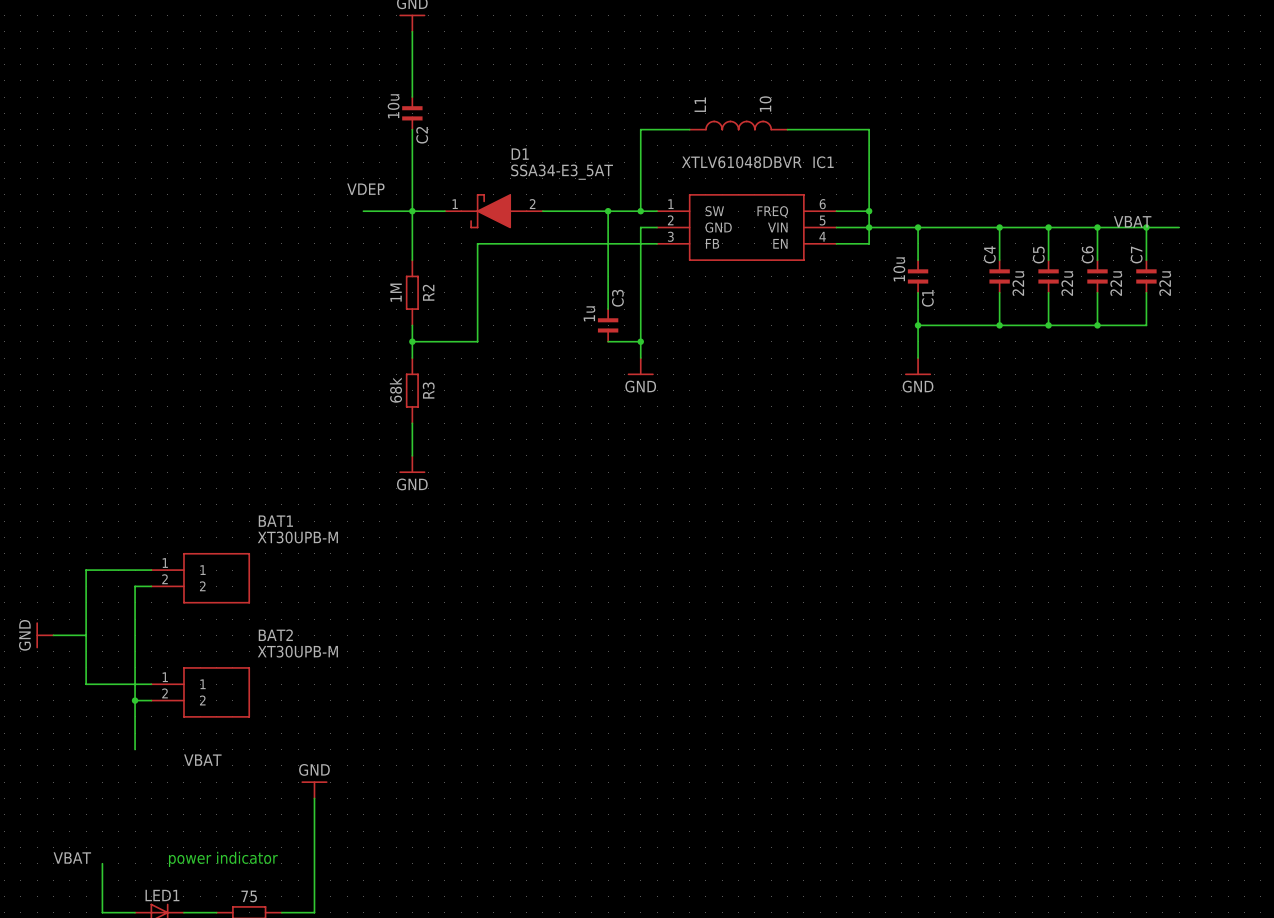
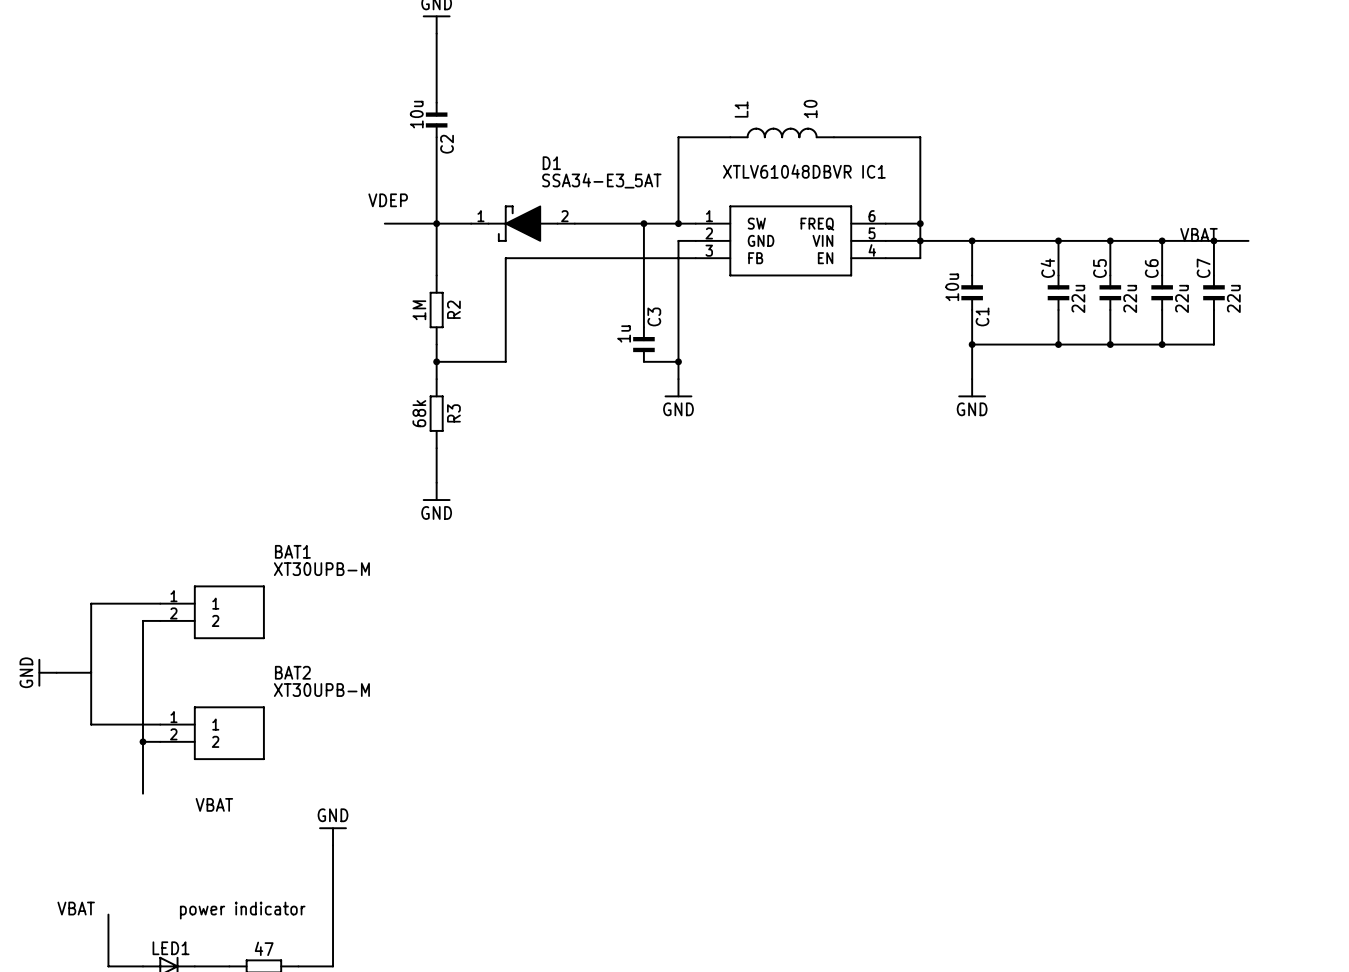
part value: 75 (249, 896) -> 47 (264, 948)

